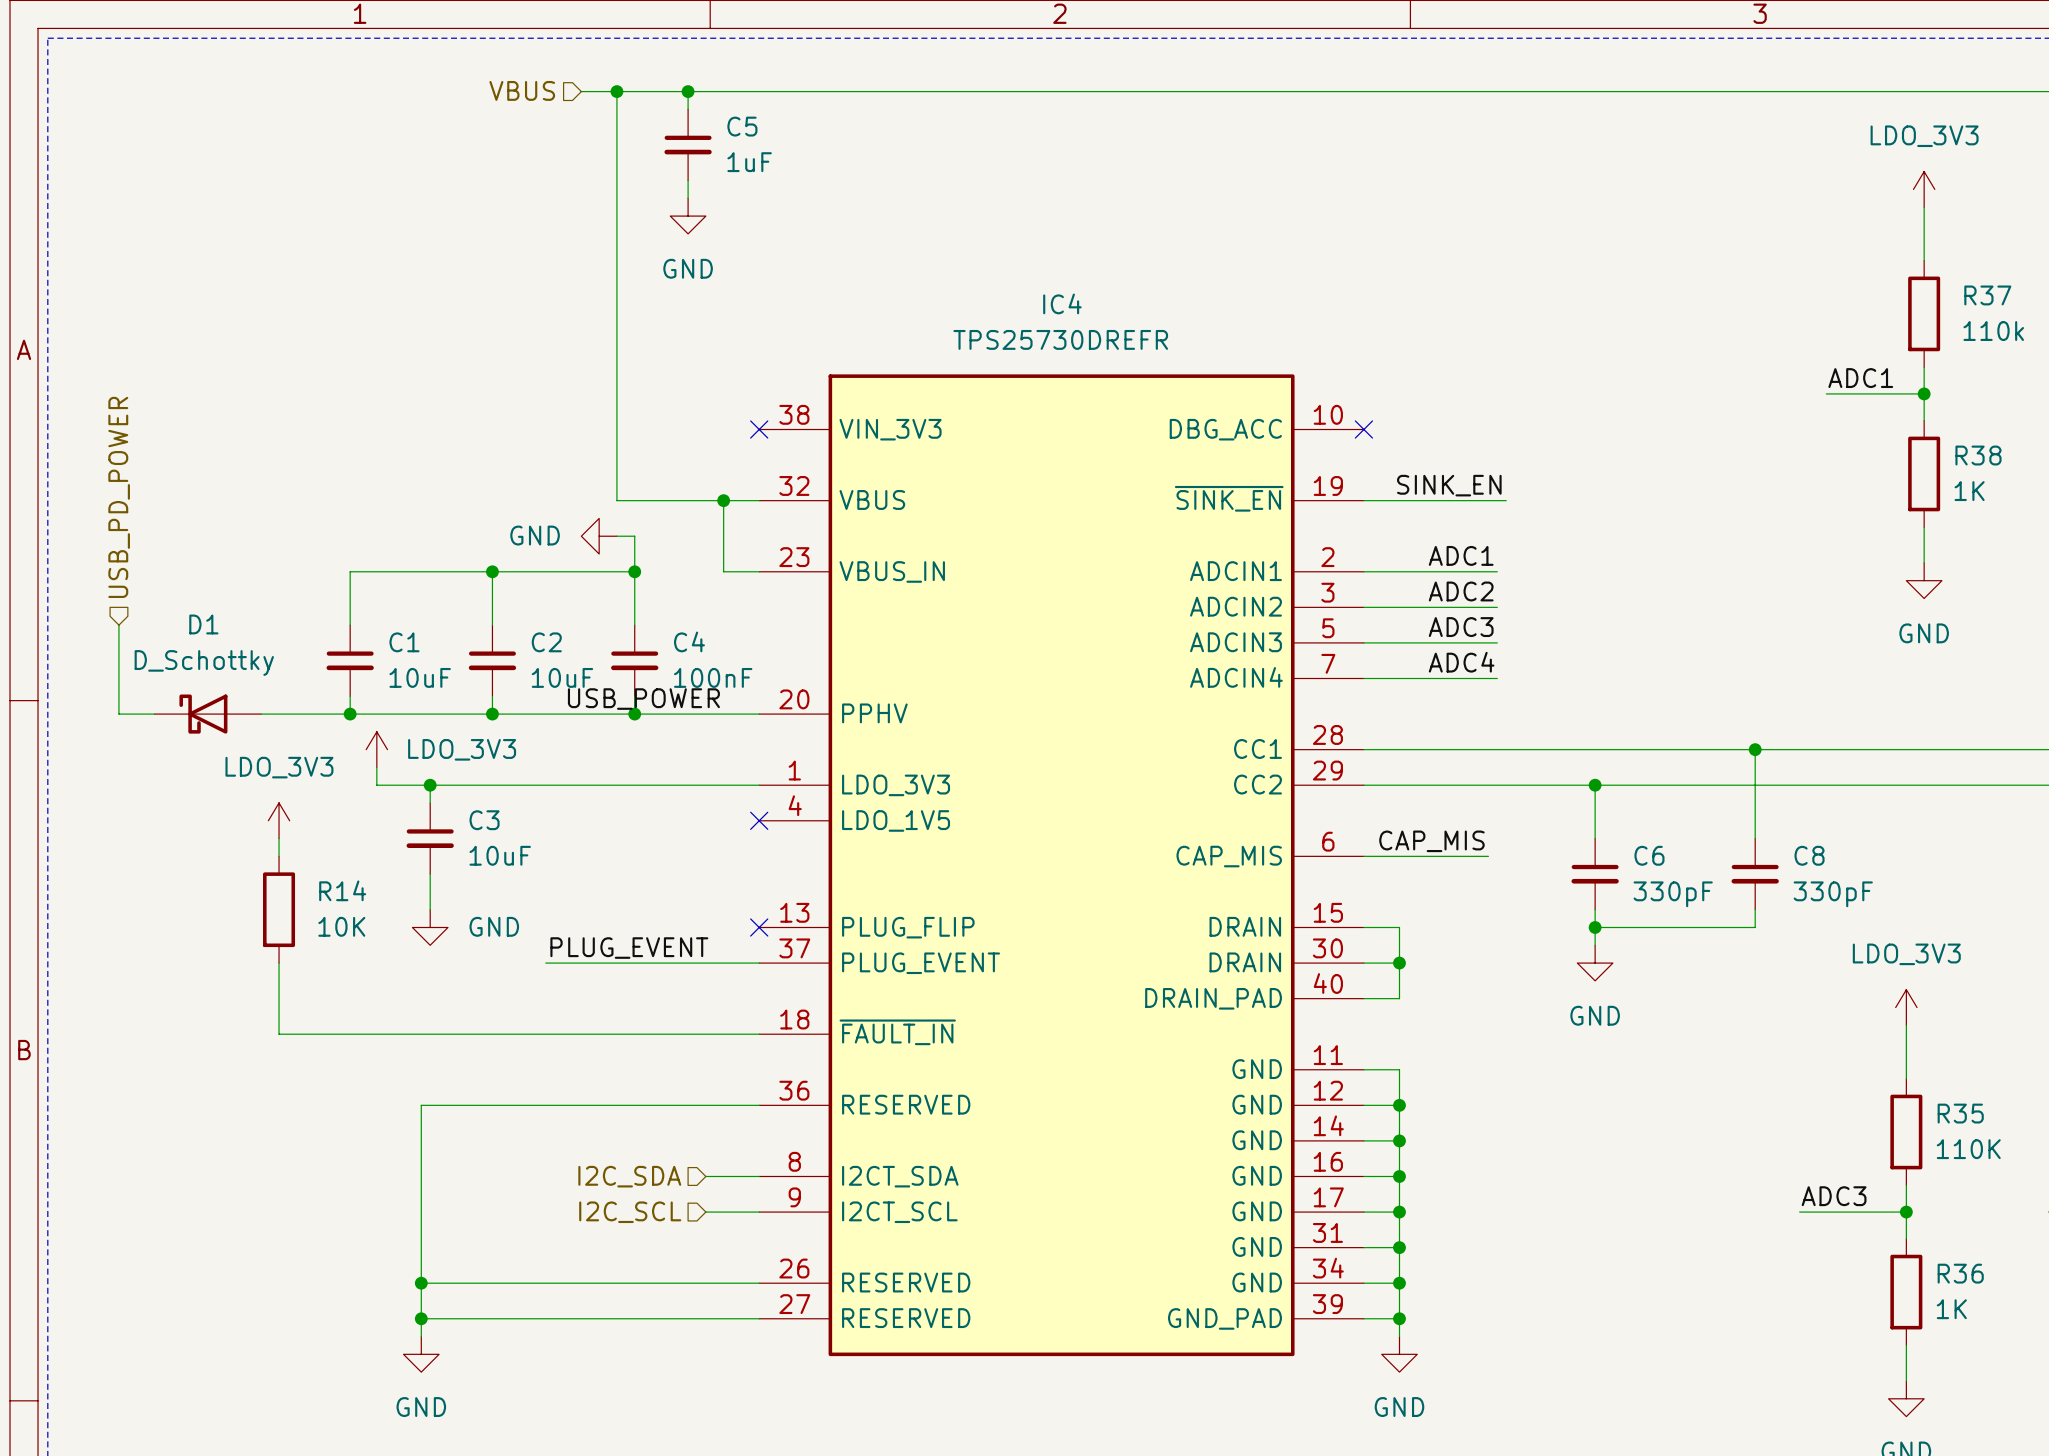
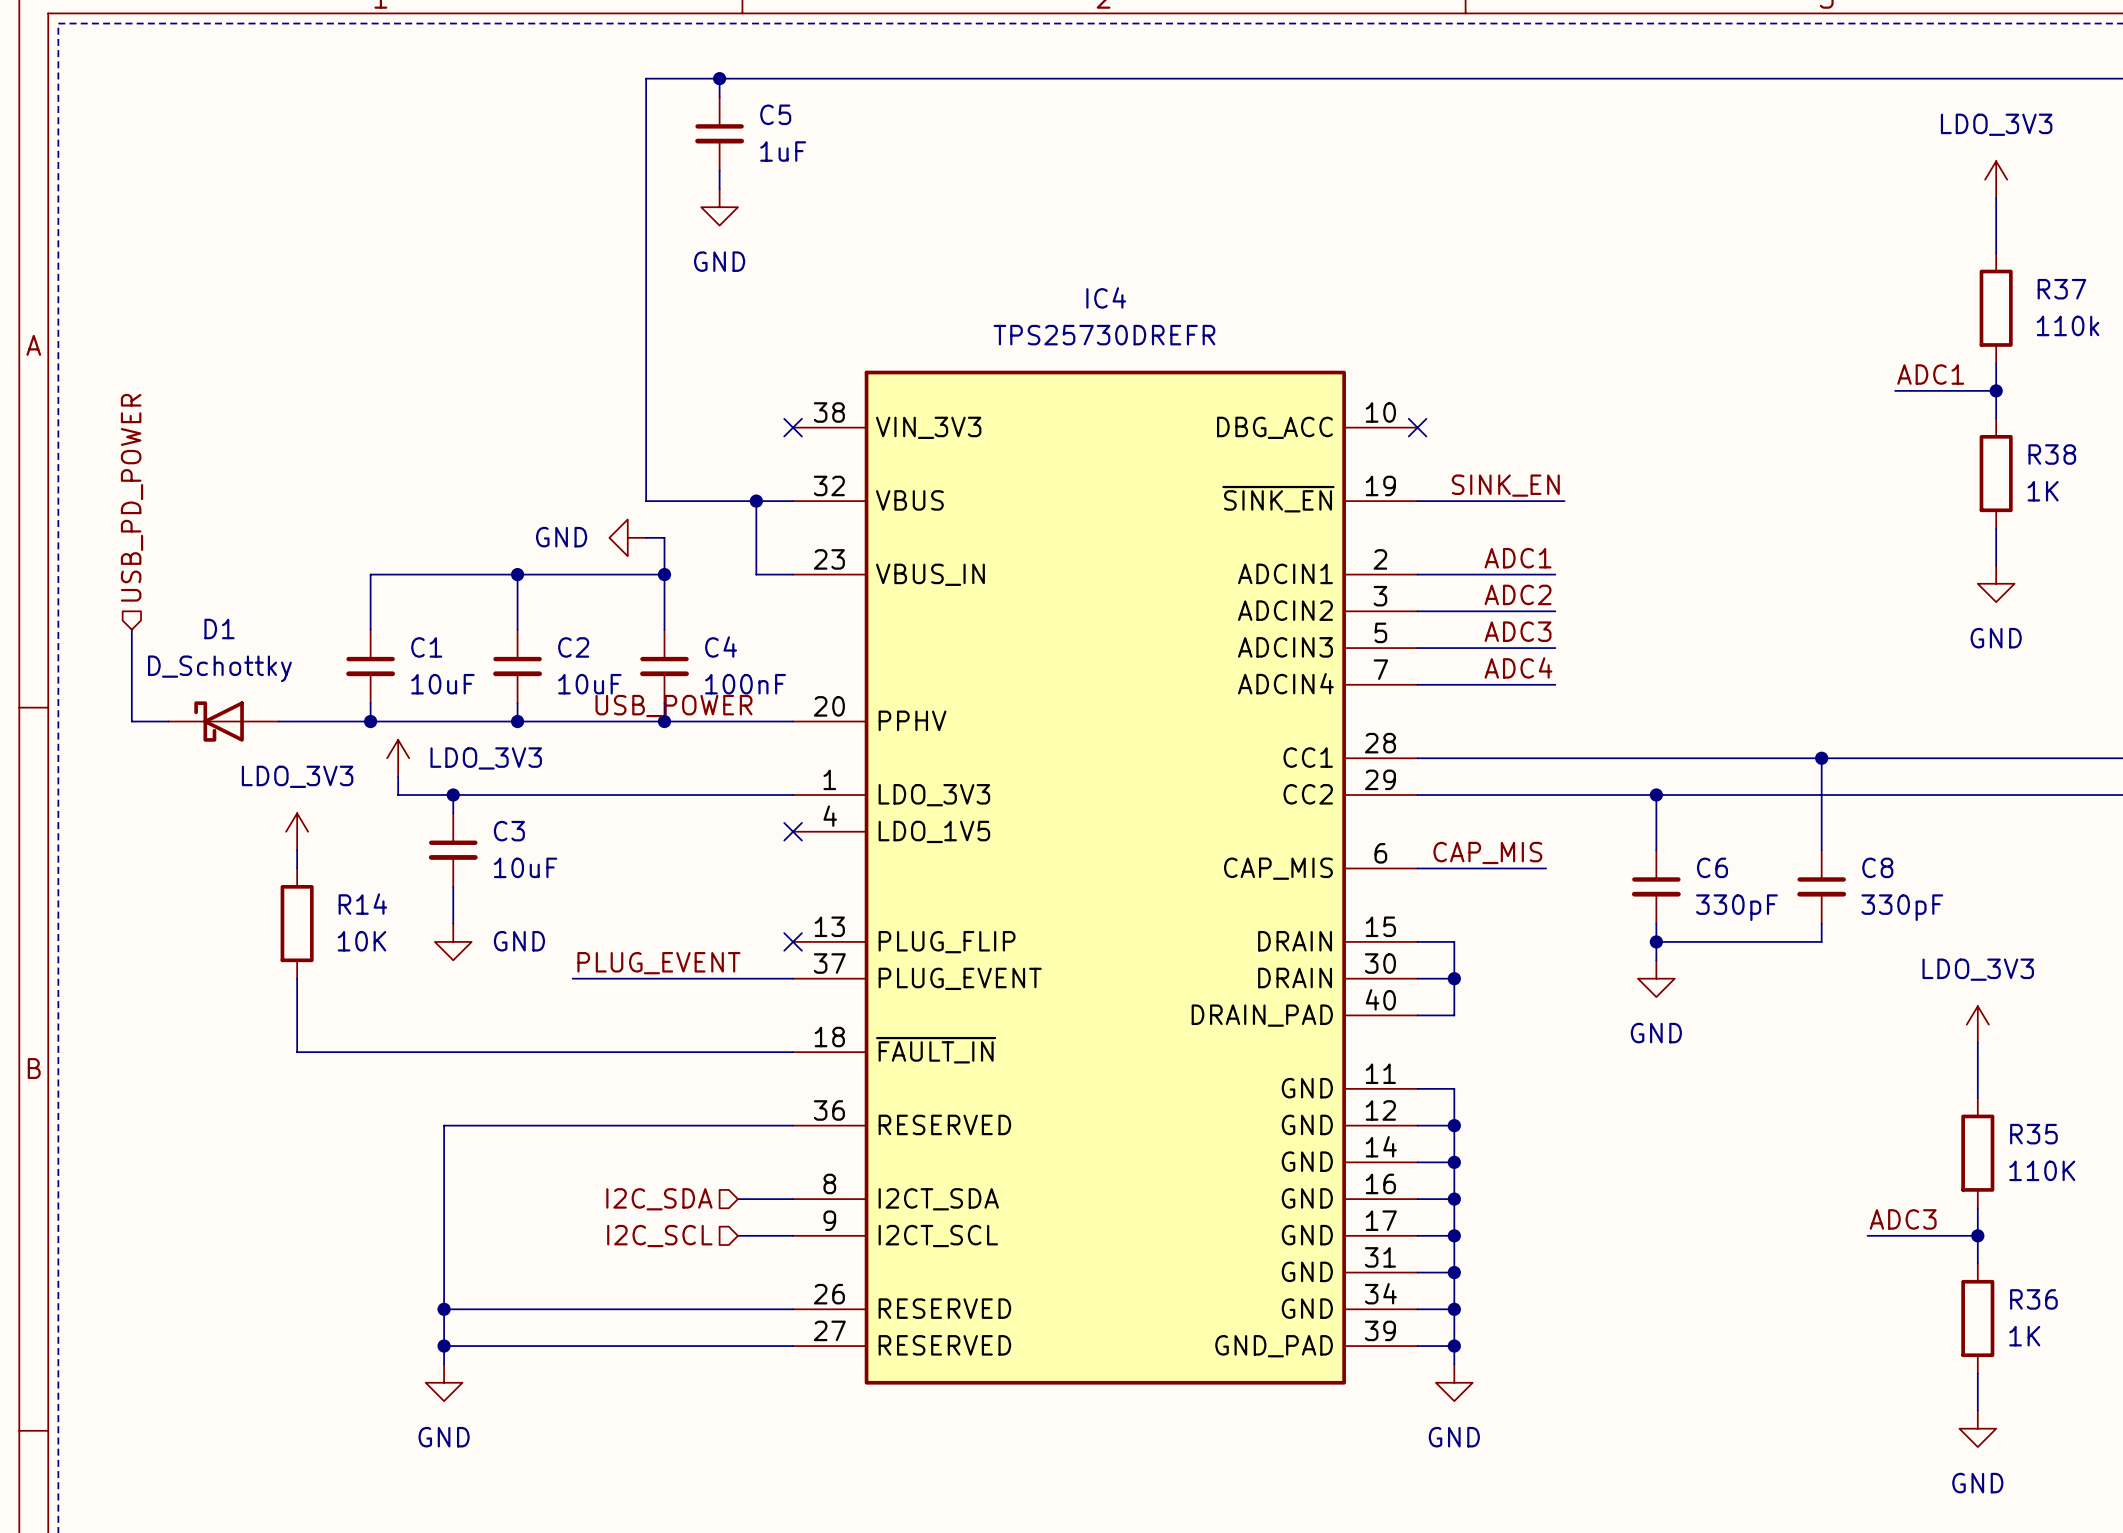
hierarchical label: VBUS (522, 90) -> none
wire: (581, 91) (616, 91) -> none
junction: (616, 91) -> none

